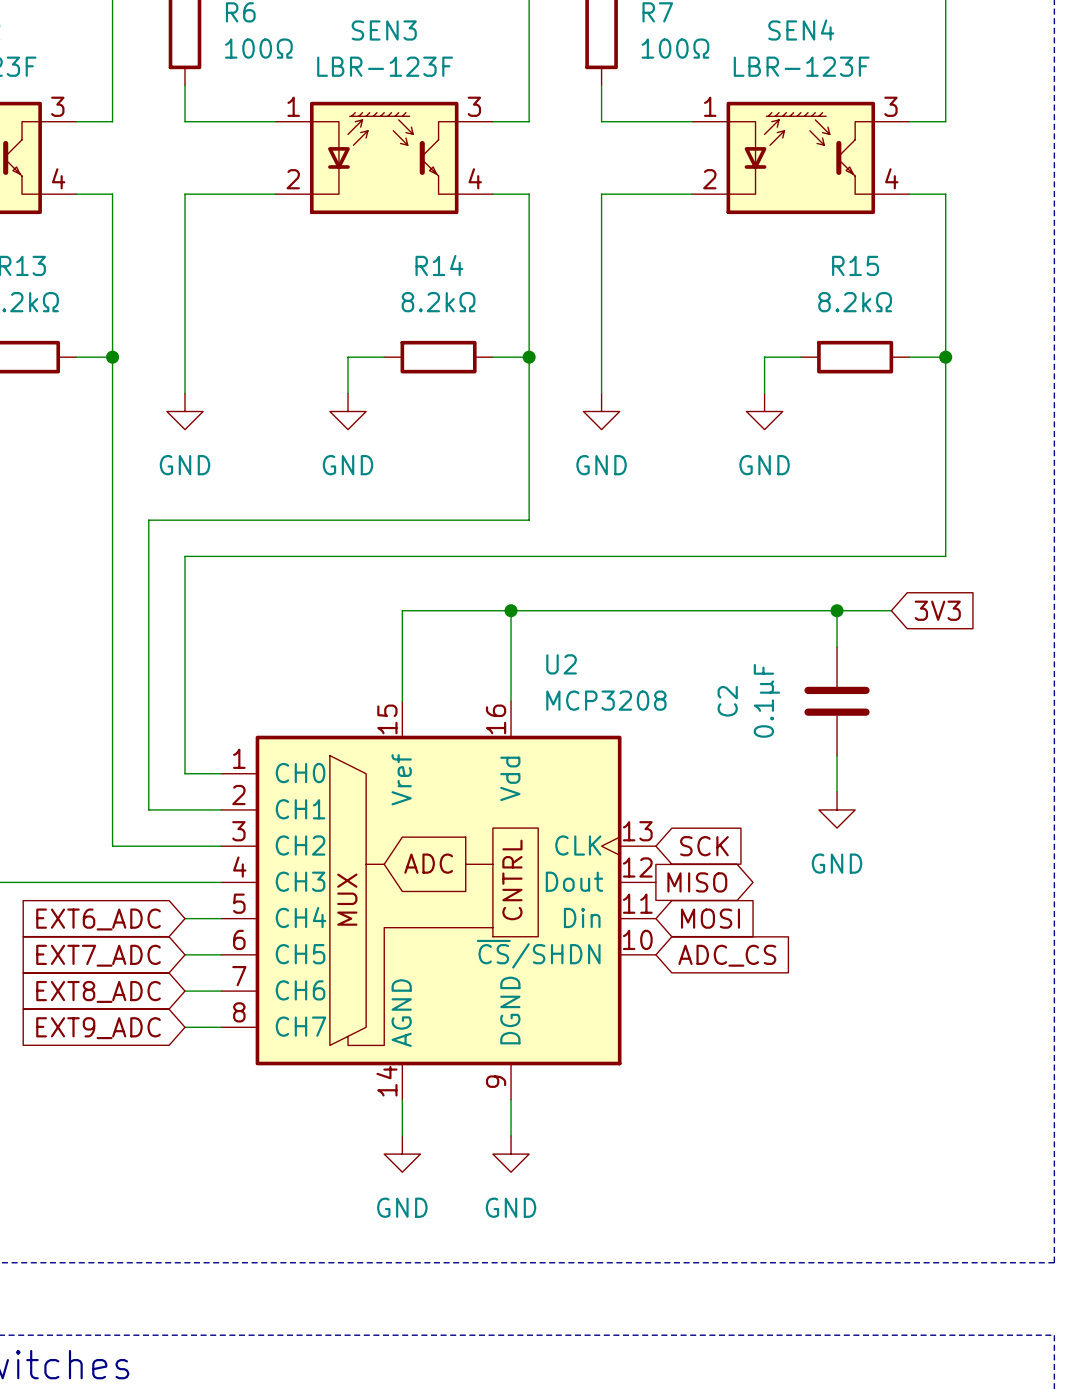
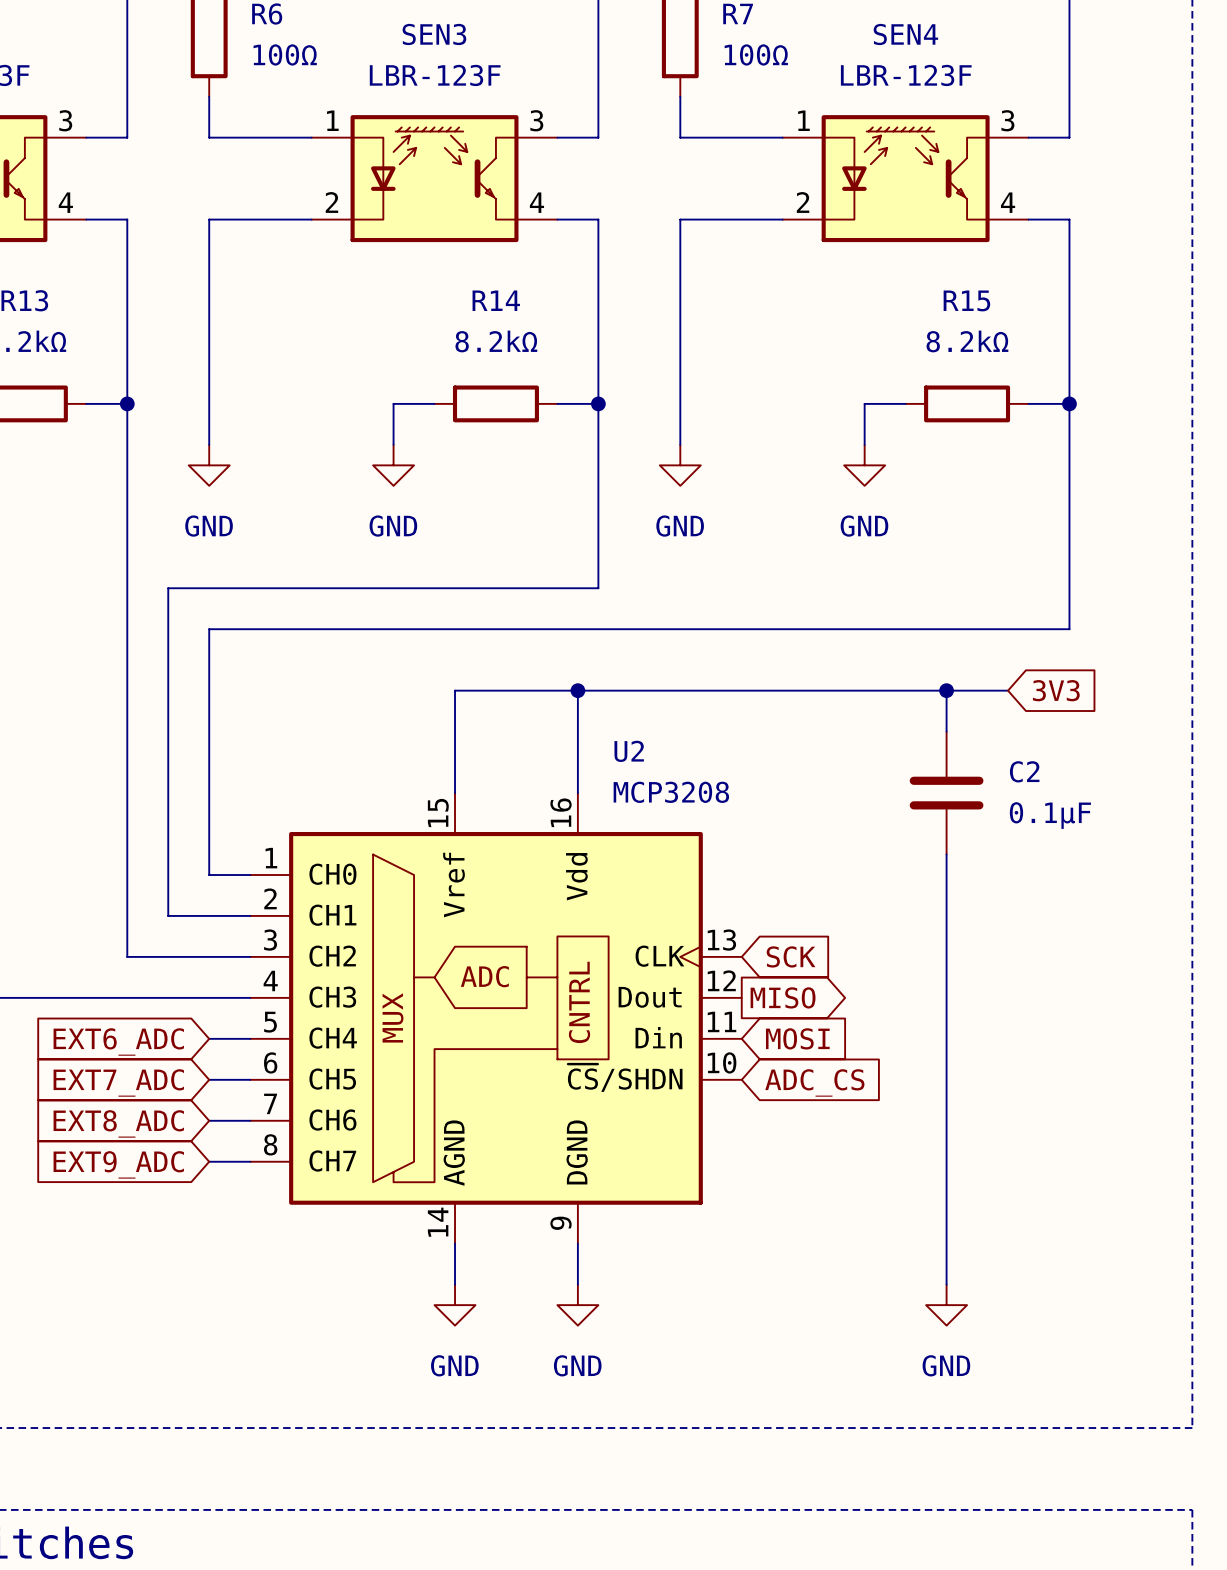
C2 value rotation: 0° (766, 700) -> 90° clockwise (1050, 815)
C2 value position: 0.1μF (766, 700) -> 0.1μF (1050, 815)
C2 name rotation: 0° (727, 701) -> 90° clockwise (1024, 771)
C2 name position: C2 (727, 701) -> C2 (1024, 771)
wire: none -> (946, 895) (946, 1284)
power symbol position: GND (837, 809) -> GND (946, 1305)

